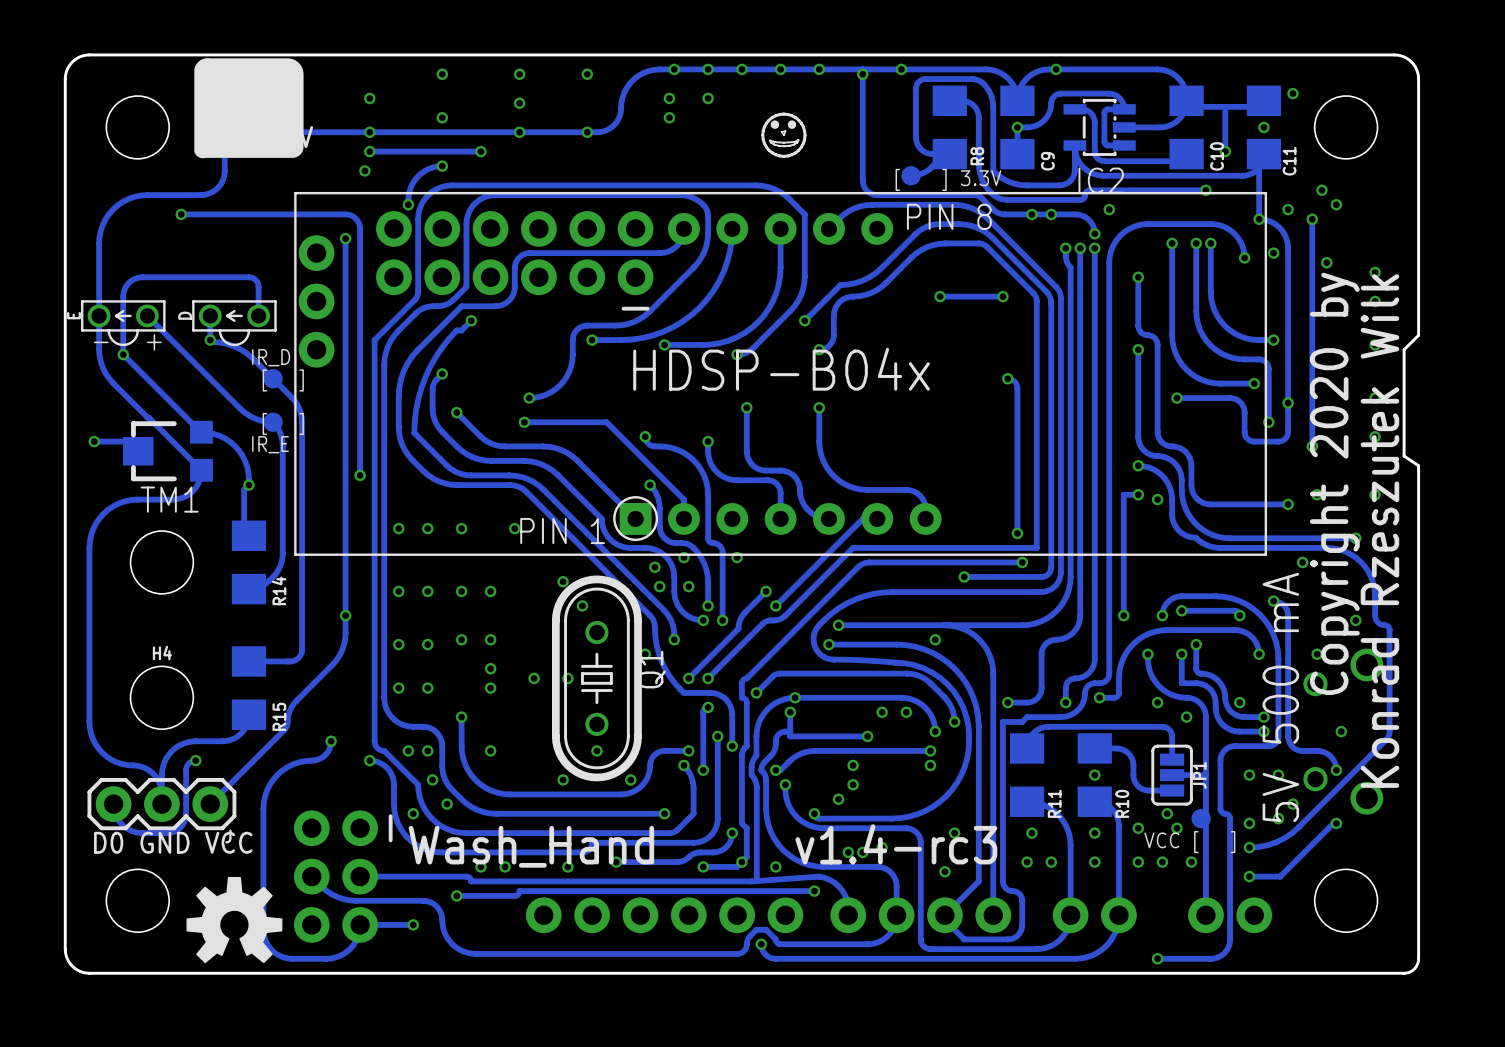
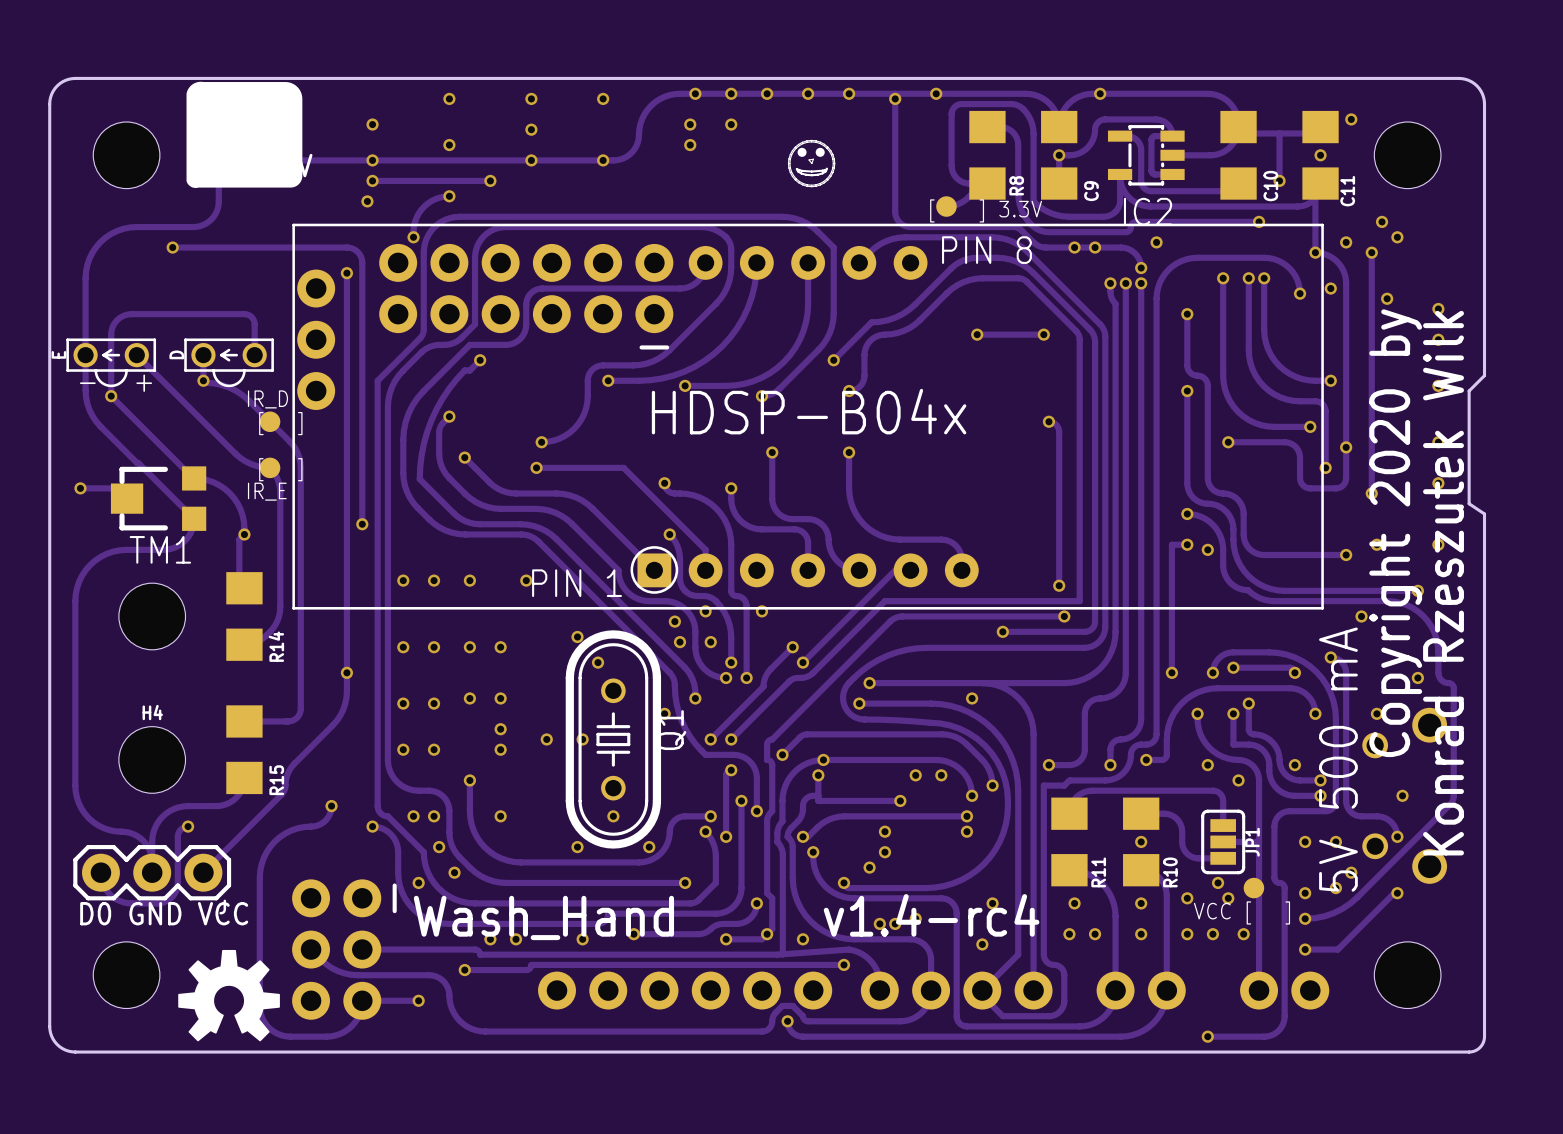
text: v1.4-rc3 (896, 844) -> v1.4-rc4 (931, 915)

